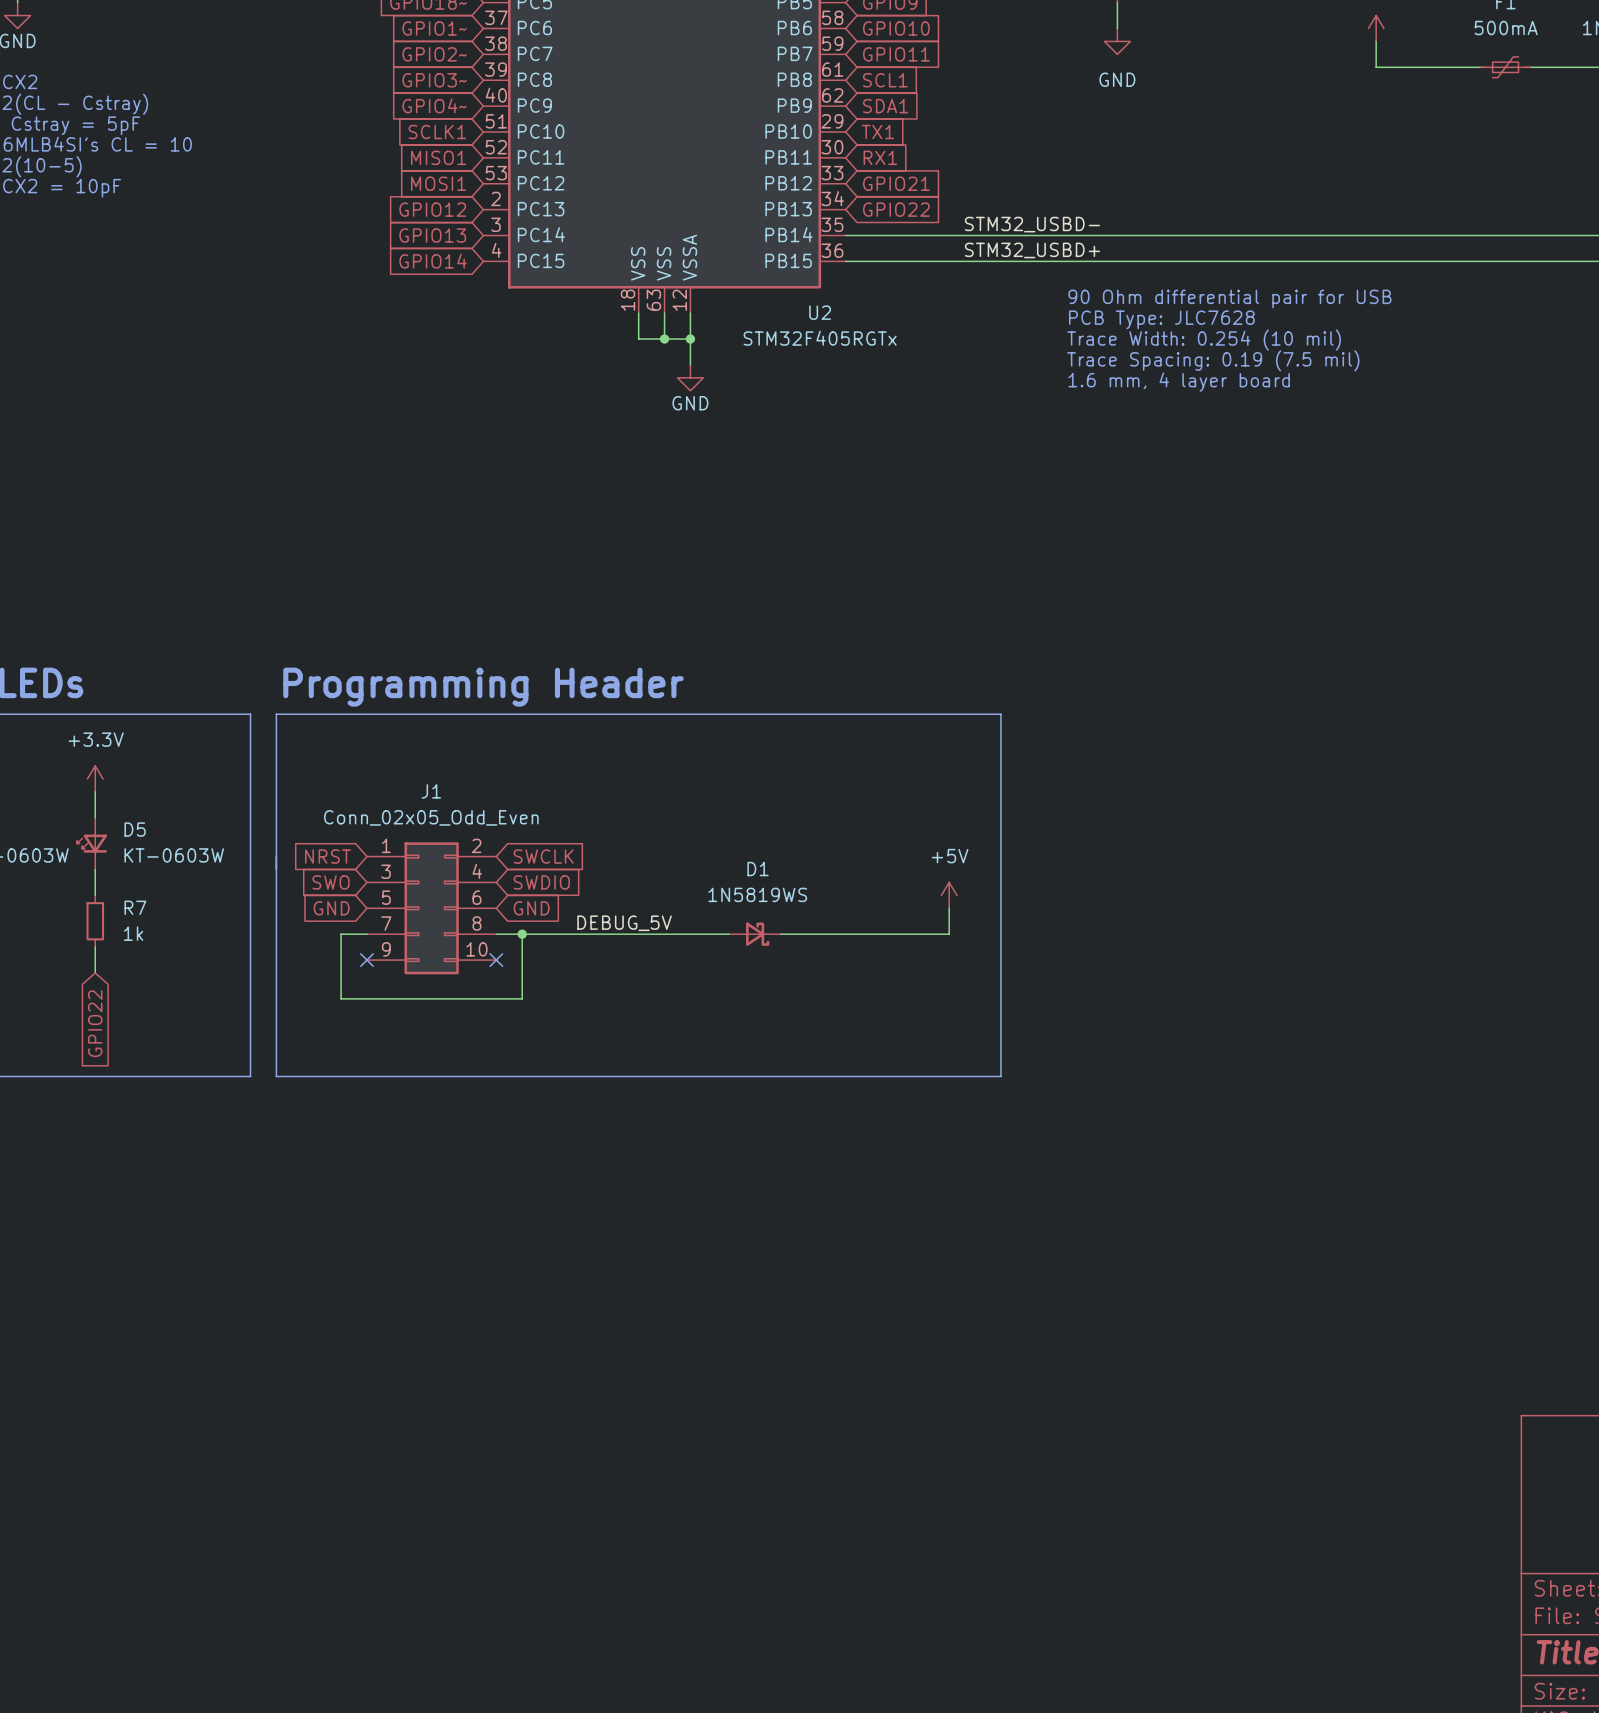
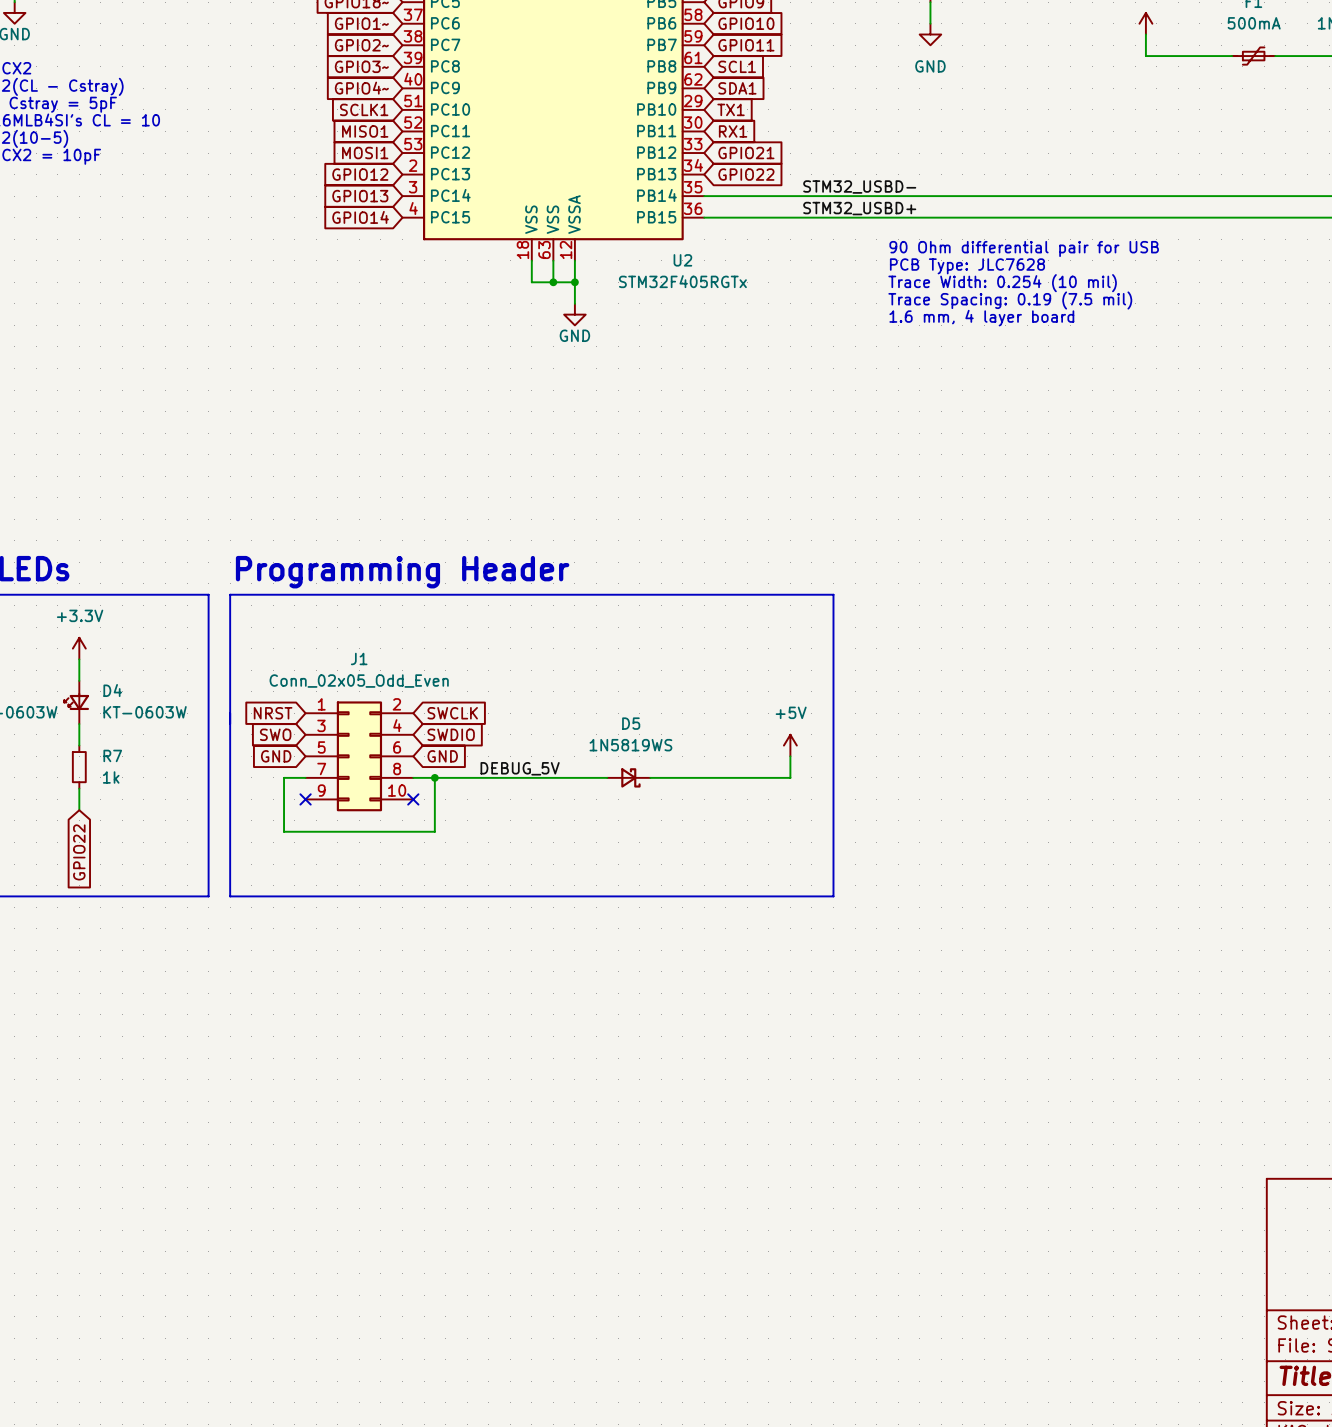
D5 name: D5 (135, 829) -> D4 (112, 690)
D1 name: D1 (758, 869) -> D5 (631, 723)

